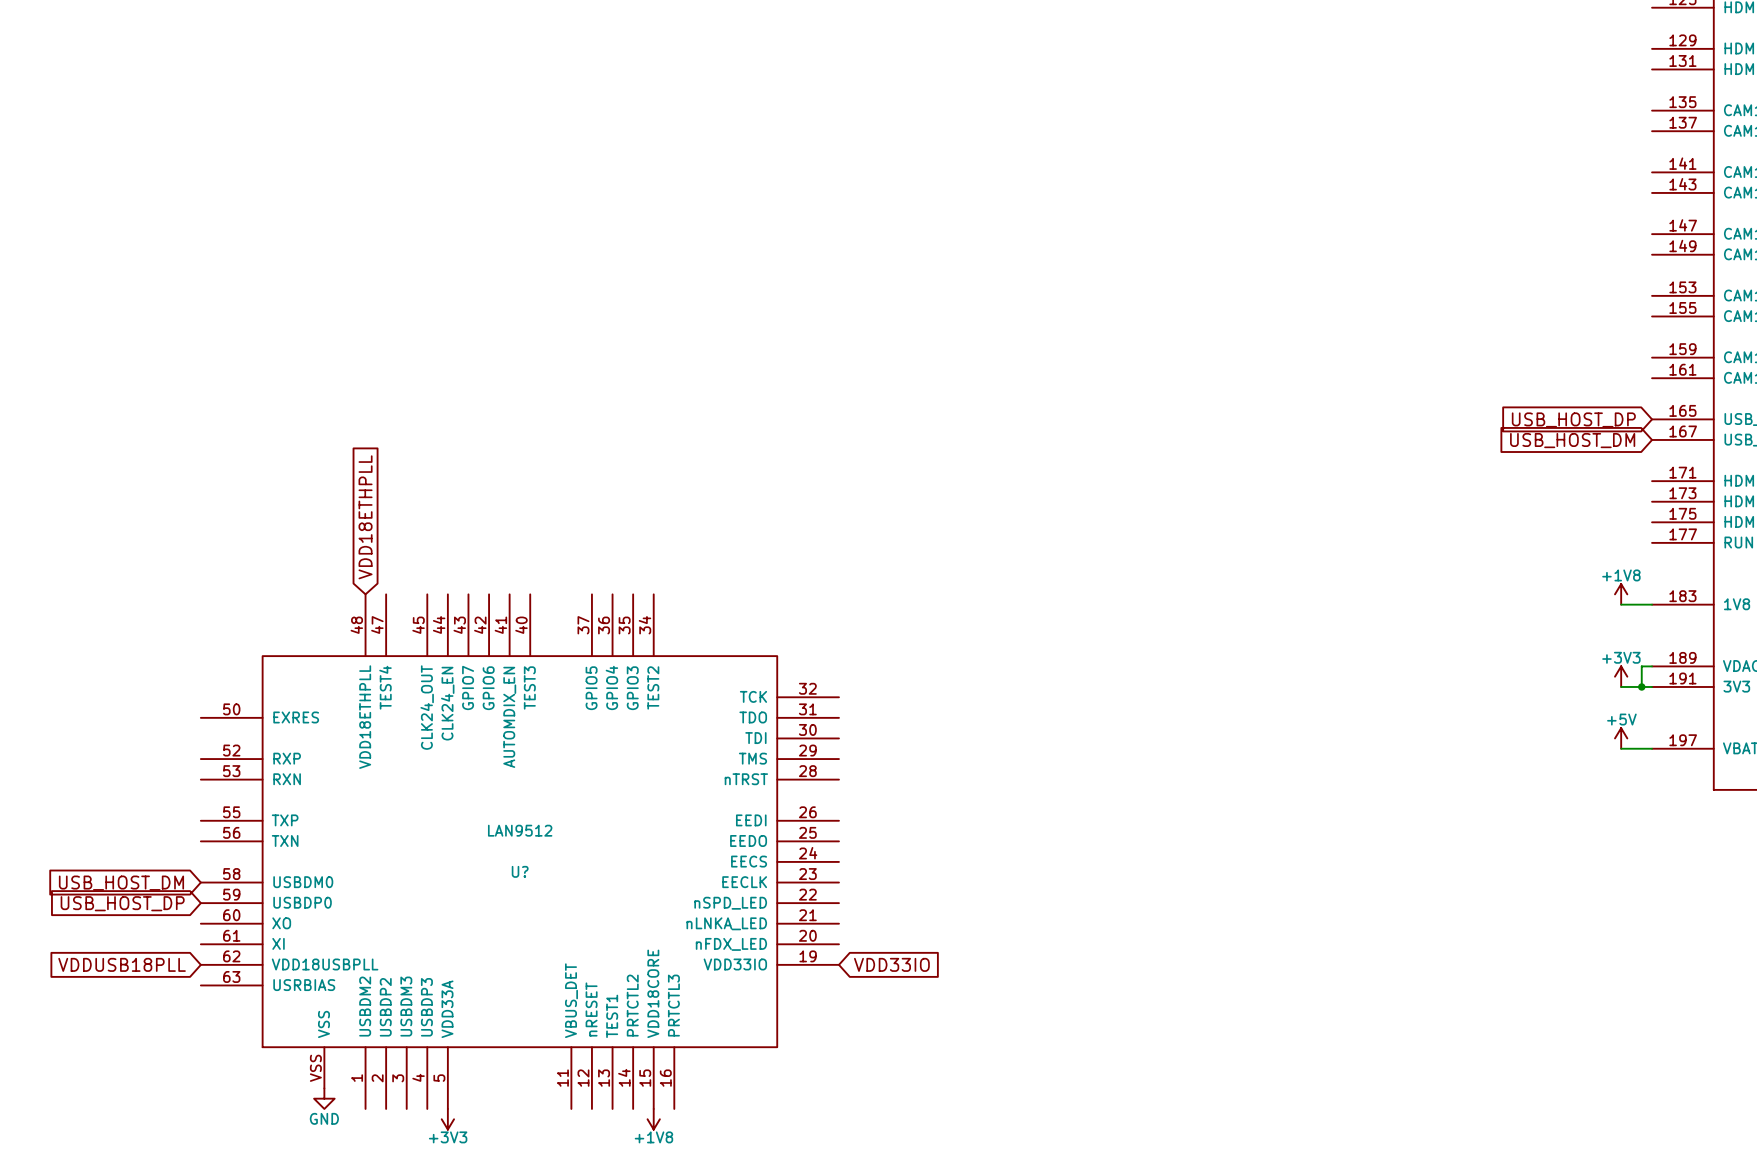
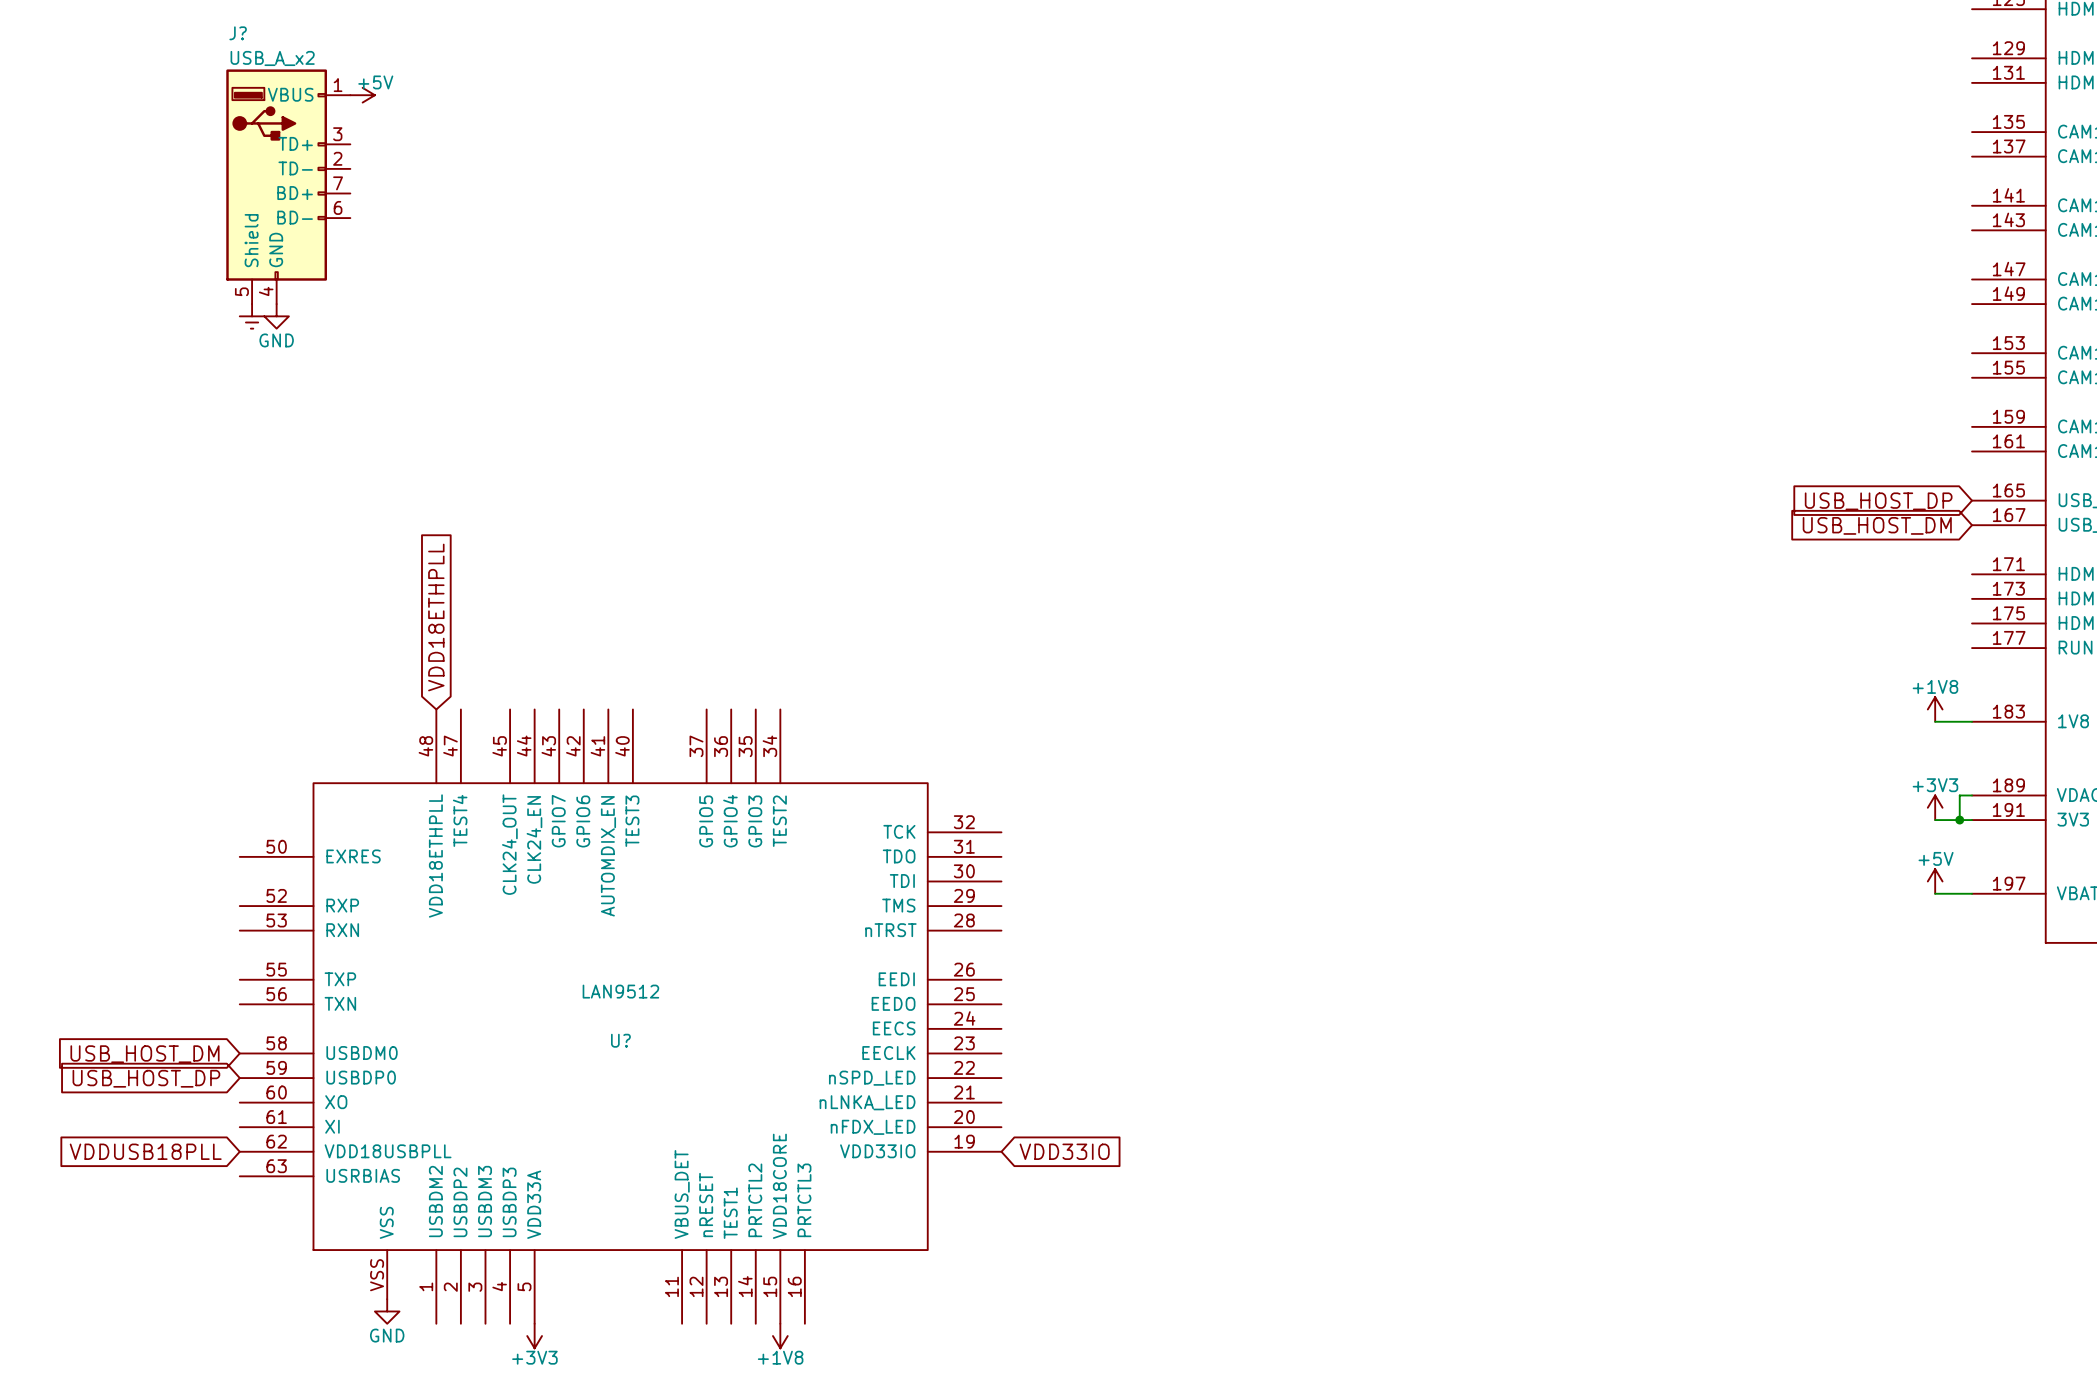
power symbol: none -> +5V (362, 95)
J?: none -> USB_A_x2 (288, 186)
power symbol: none -> (252, 316)
power symbol: none -> GND (276, 316)

